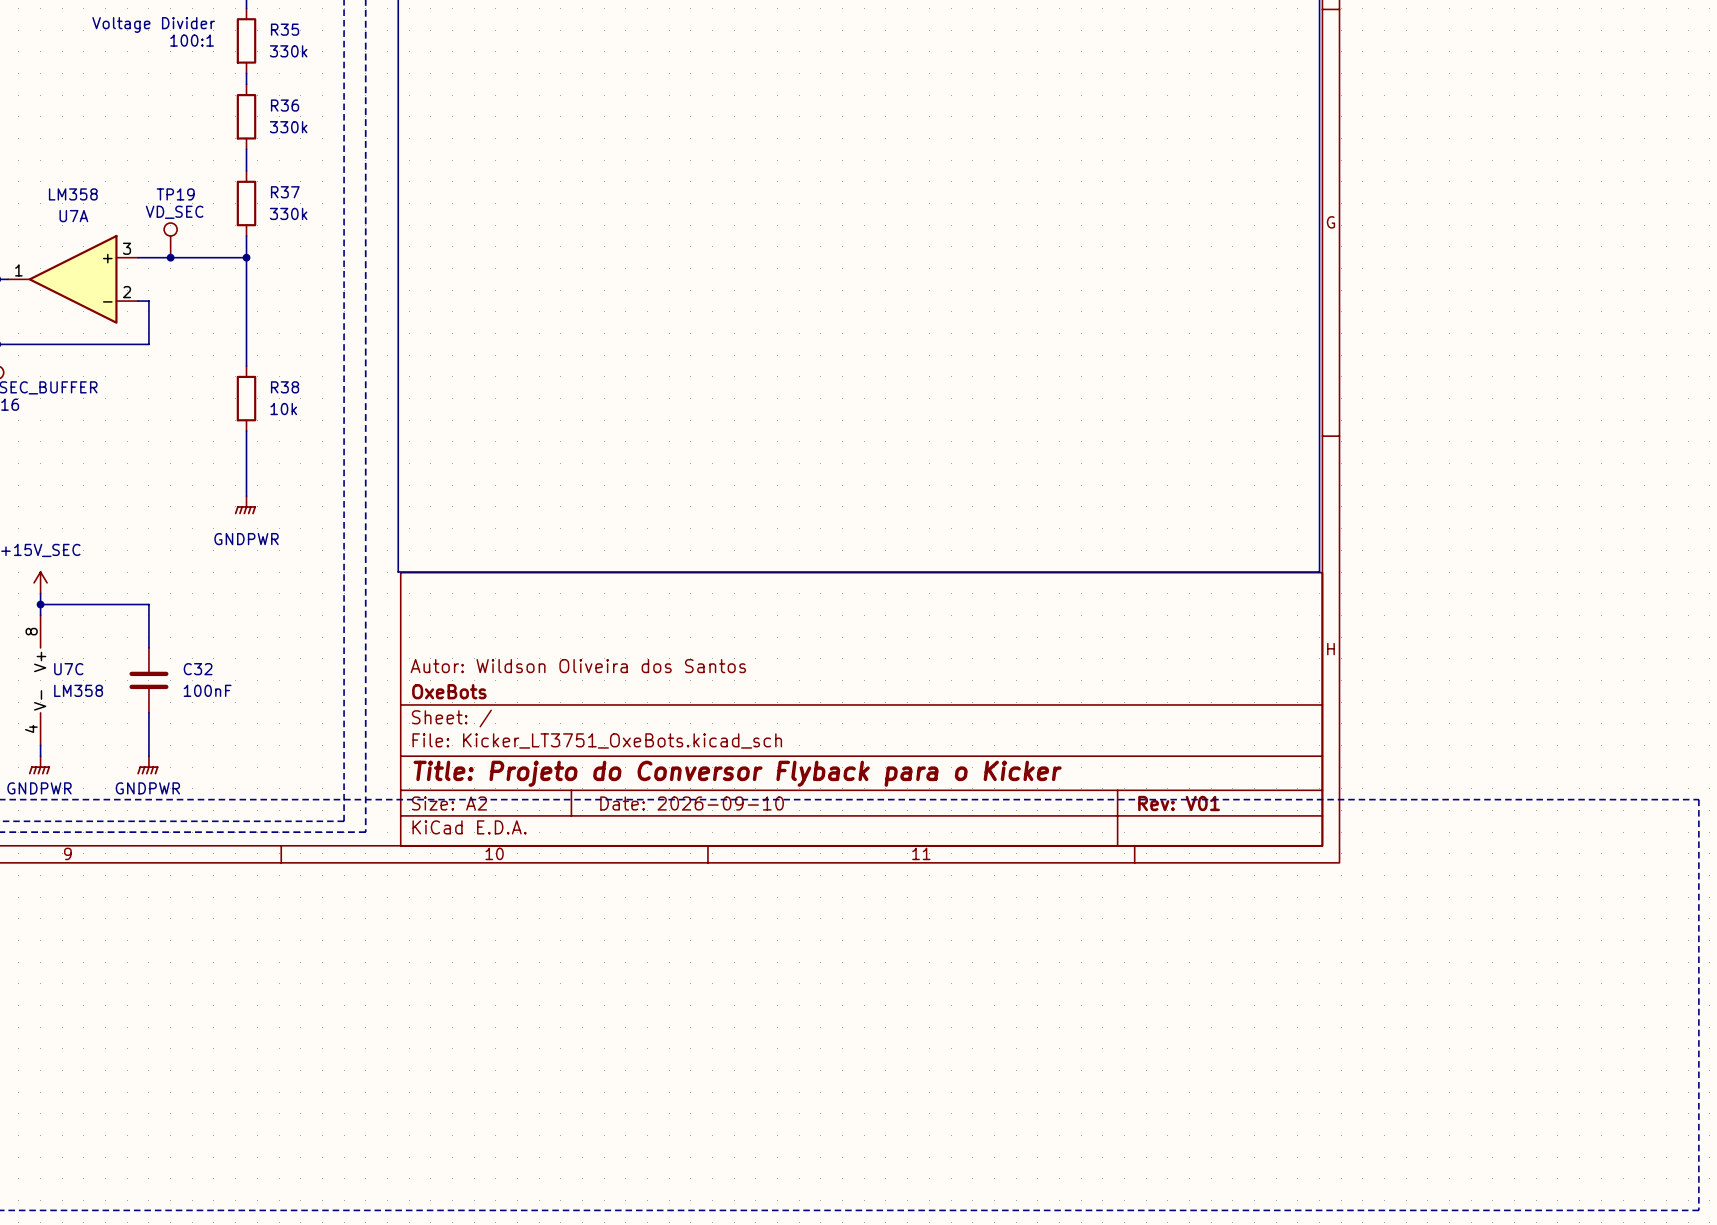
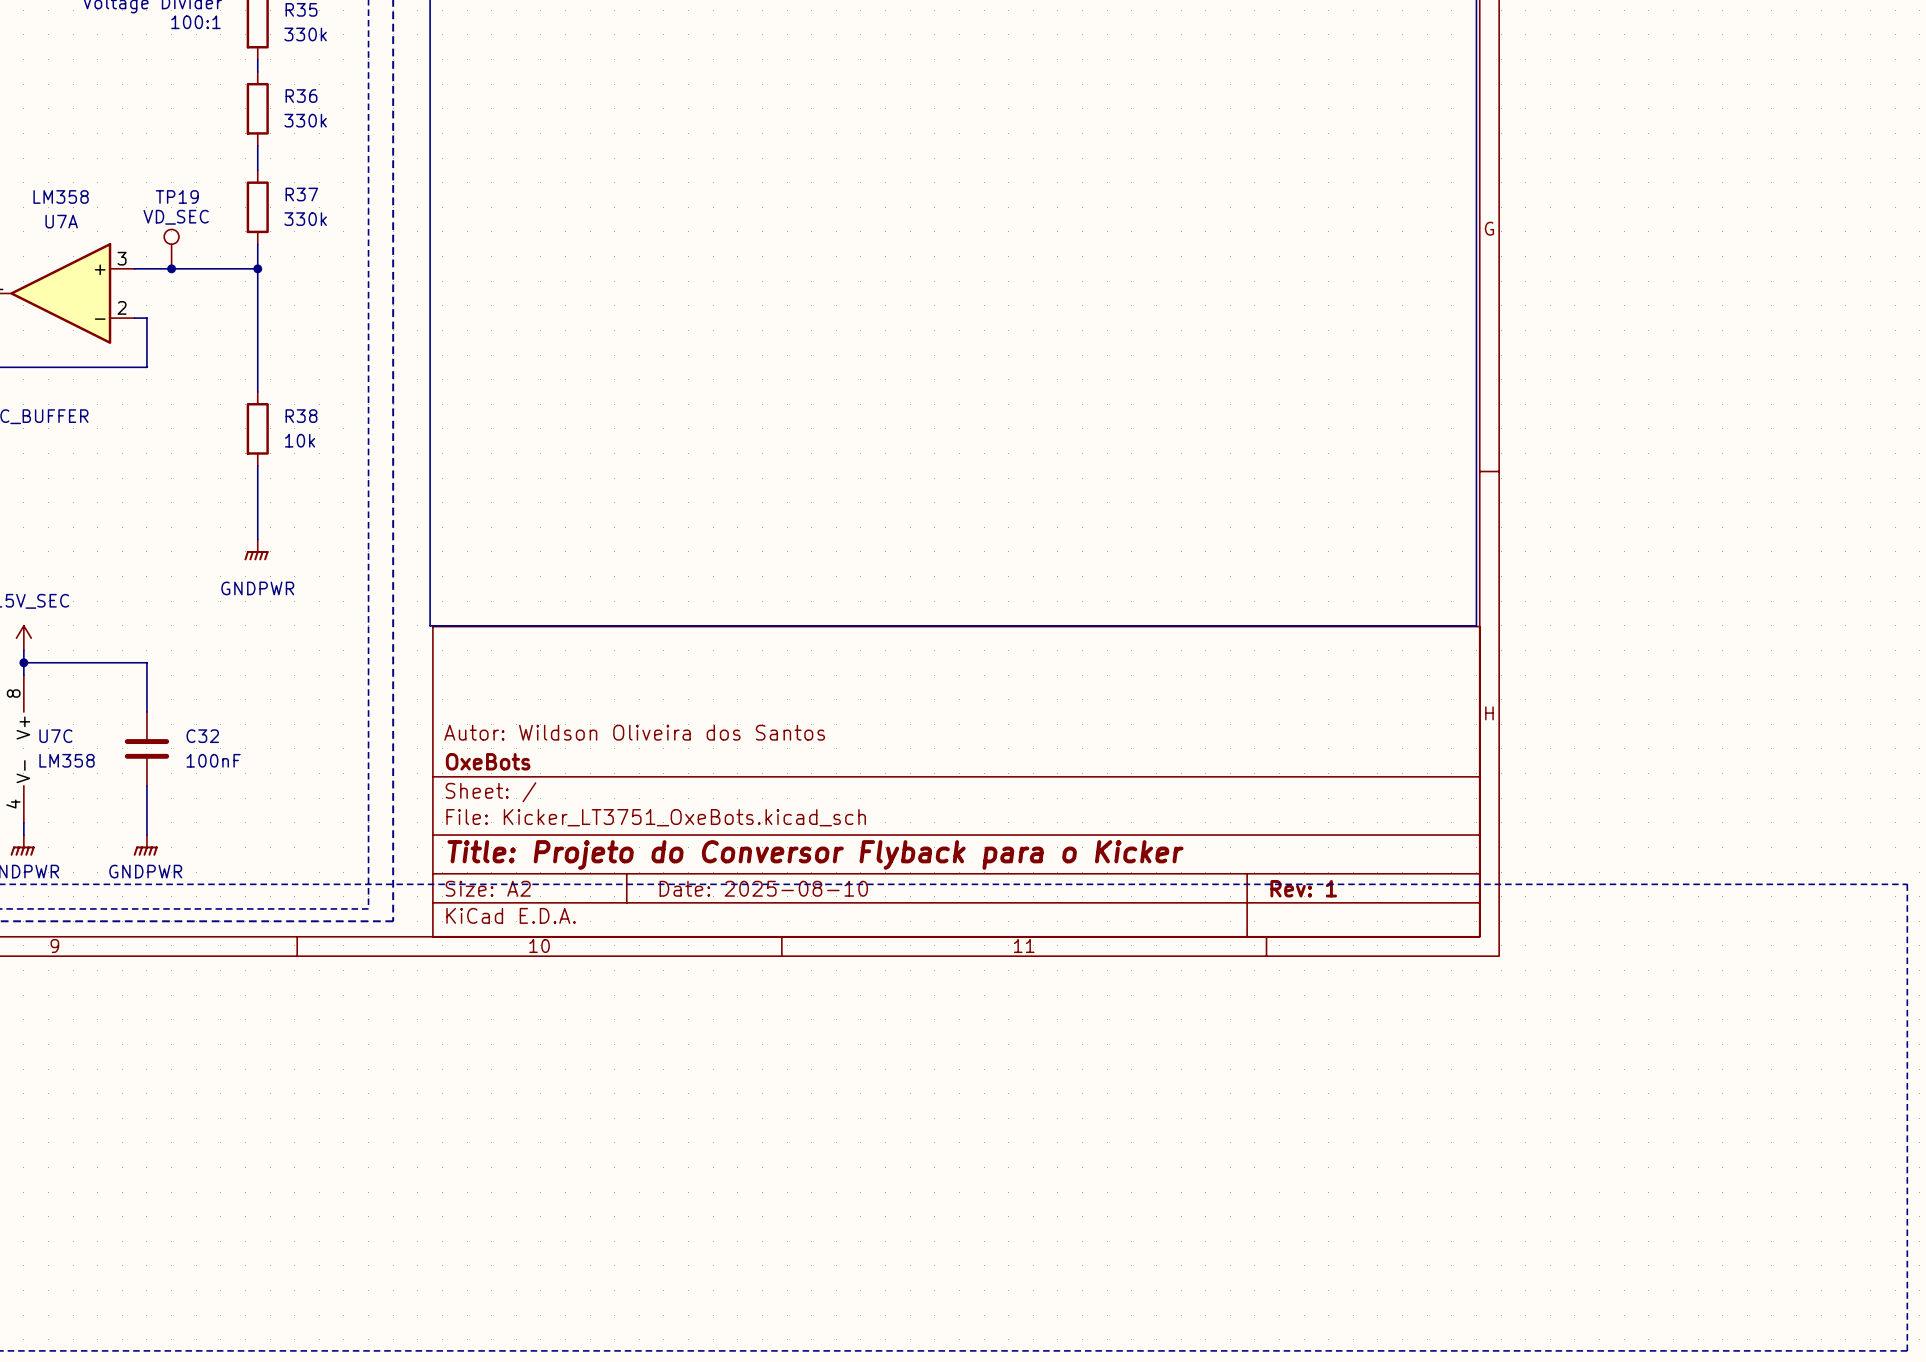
title block: Date: 2026-09-10 (692, 803) -> Date: 2025-08-10 (763, 888)
title block: Rev: V01 (1179, 803) -> Rev: 1 (1303, 888)

